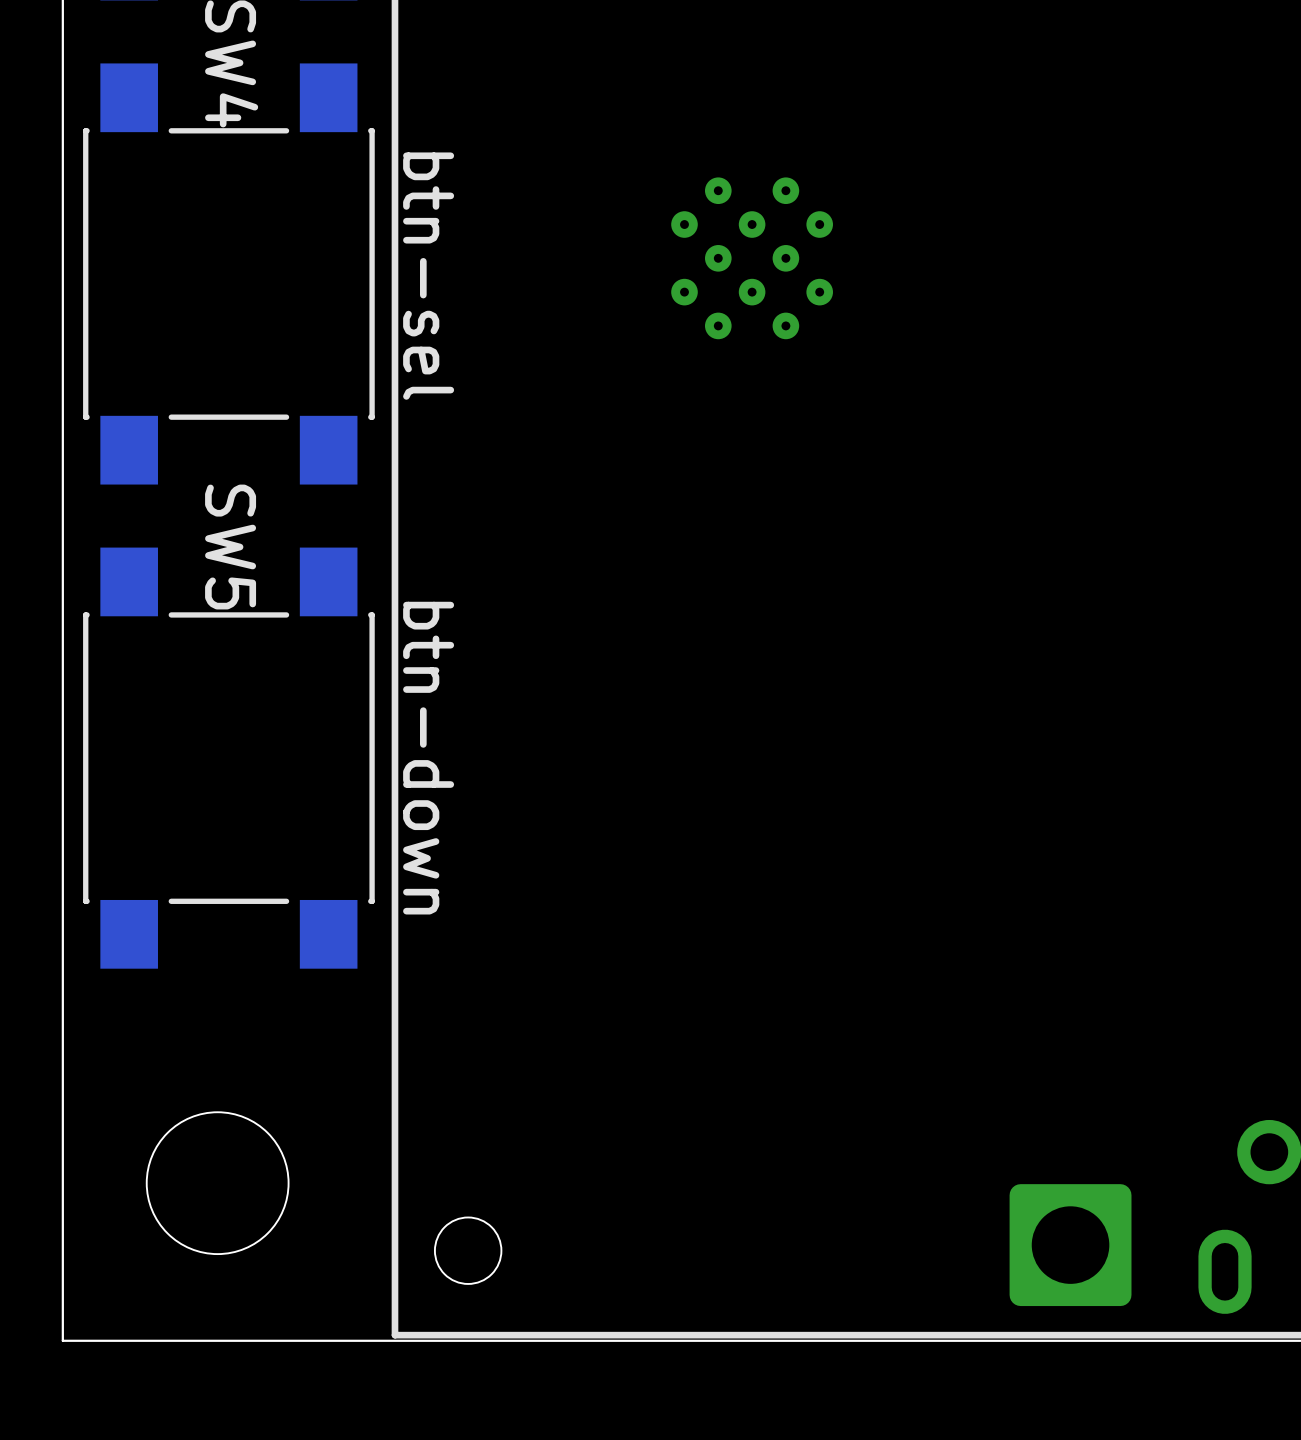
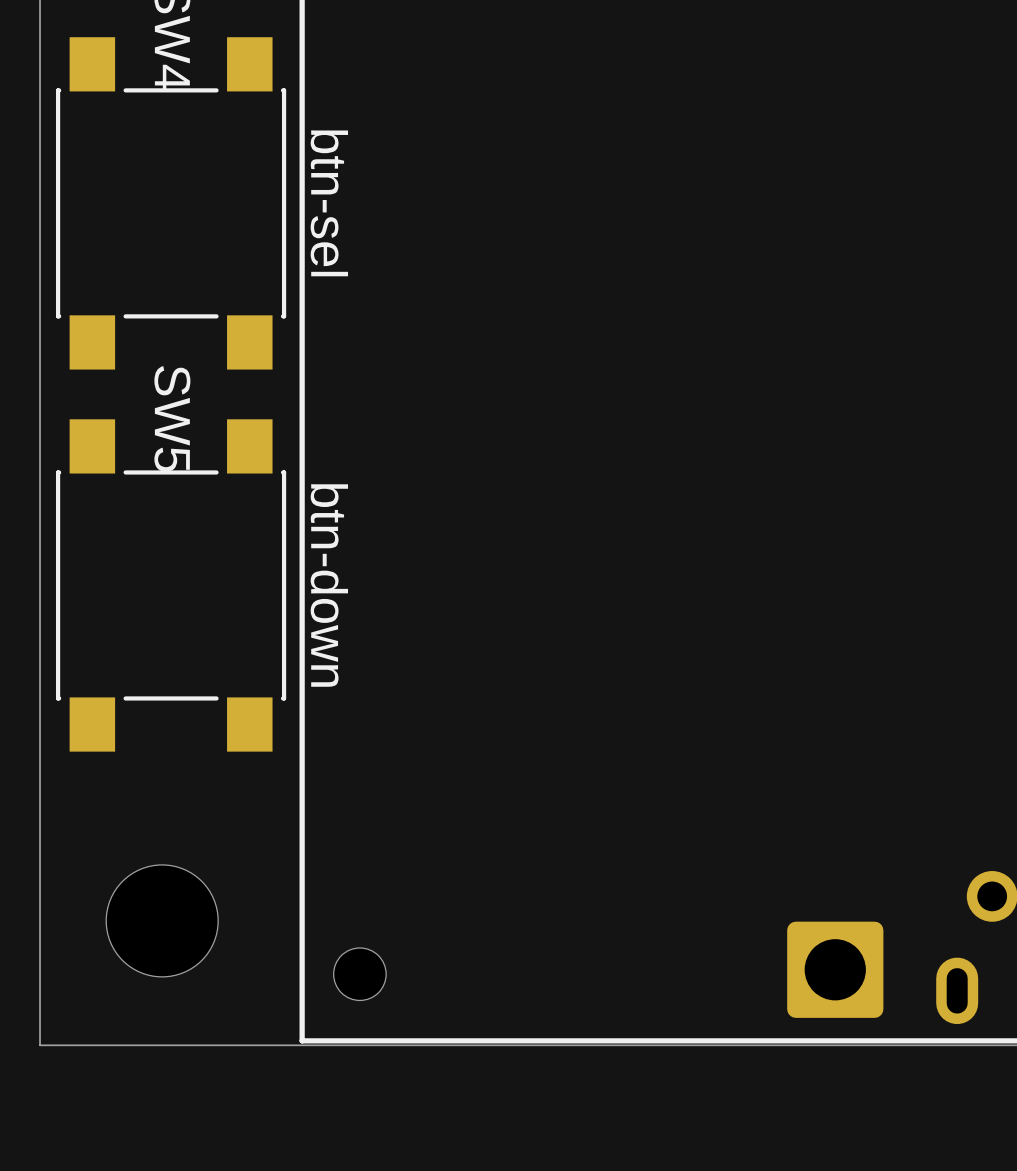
part: (752, 258) -> none

